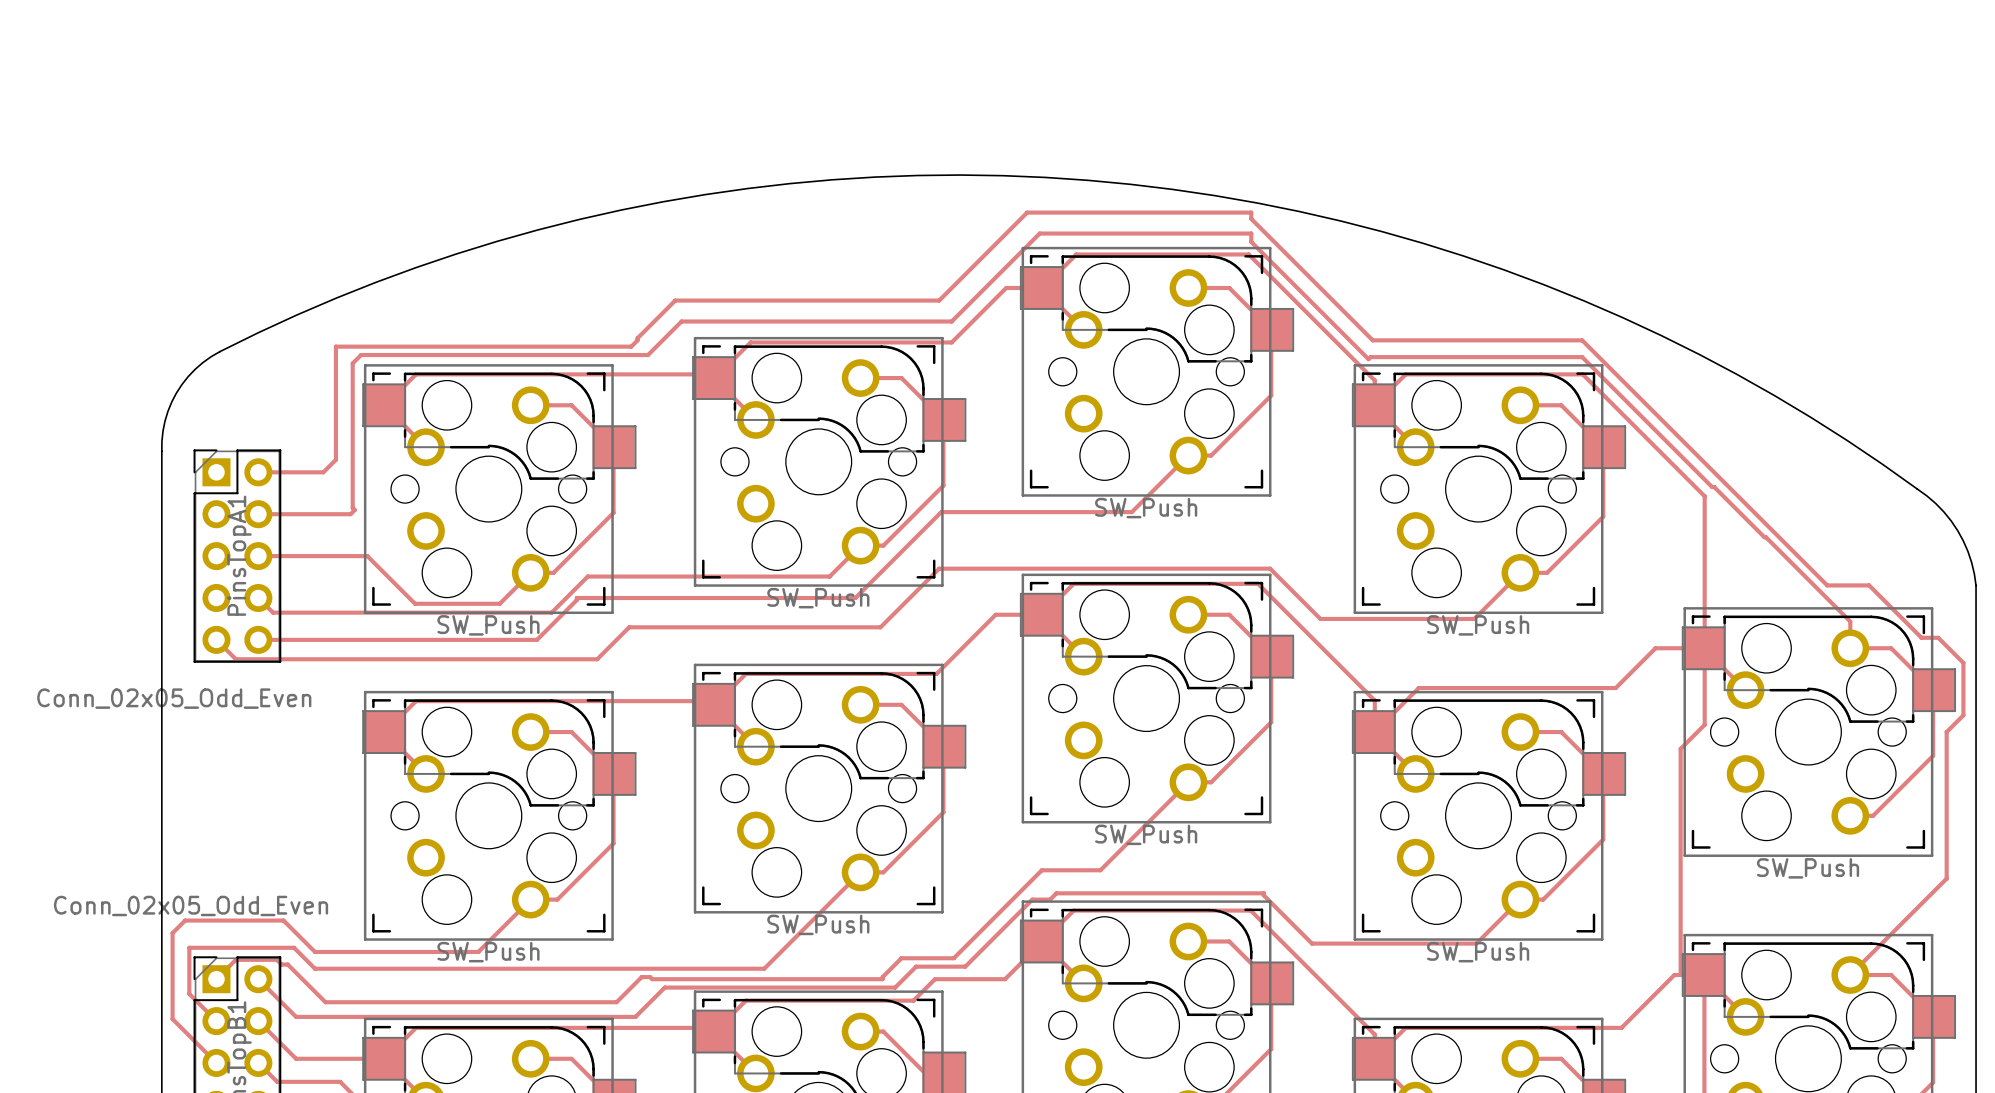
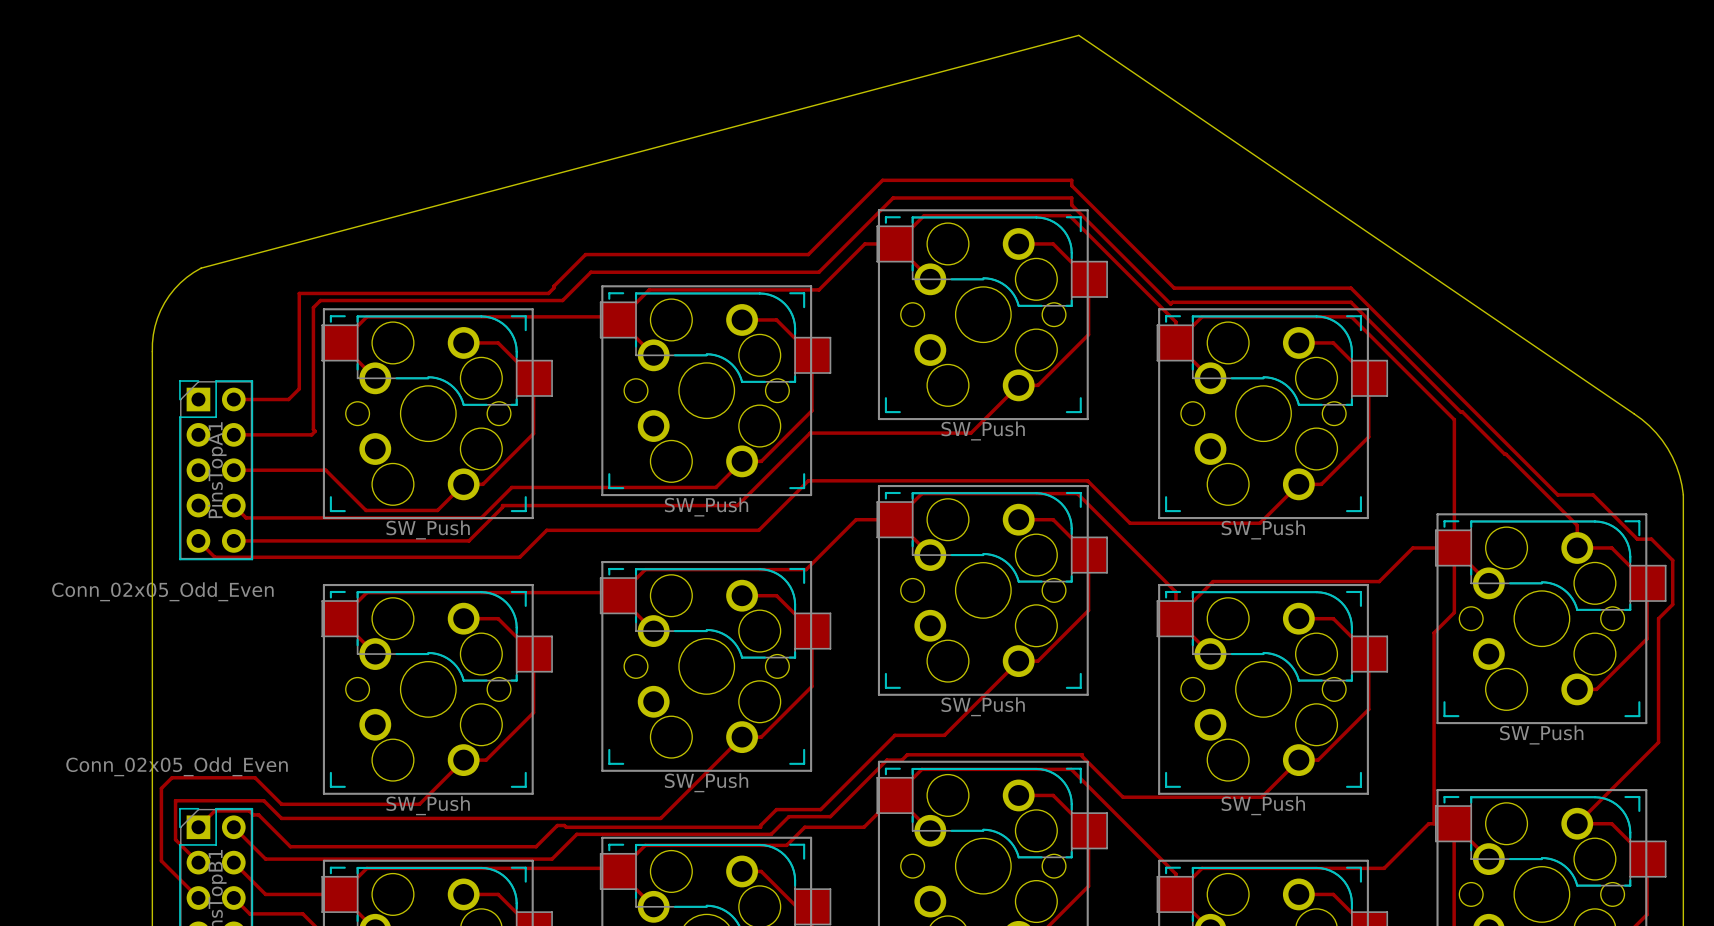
board edge: (161, 451) (164, 421) (176, 393) (195, 369) (211, 356) (258, 332) (336, 298) (456, 253) (538, 229) (621, 210) (747, 188) (874, 177) (1002, 175) (1130, 184) (1215, 195) (1340, 220) (1463, 256) (1583, 300) (1699, 354) (1811, 417) (1917, 489) -> (152, 381) (153, 334) (160, 310) (169, 295) (180, 282) (201, 268) (1078, 35) (1633, 413)

